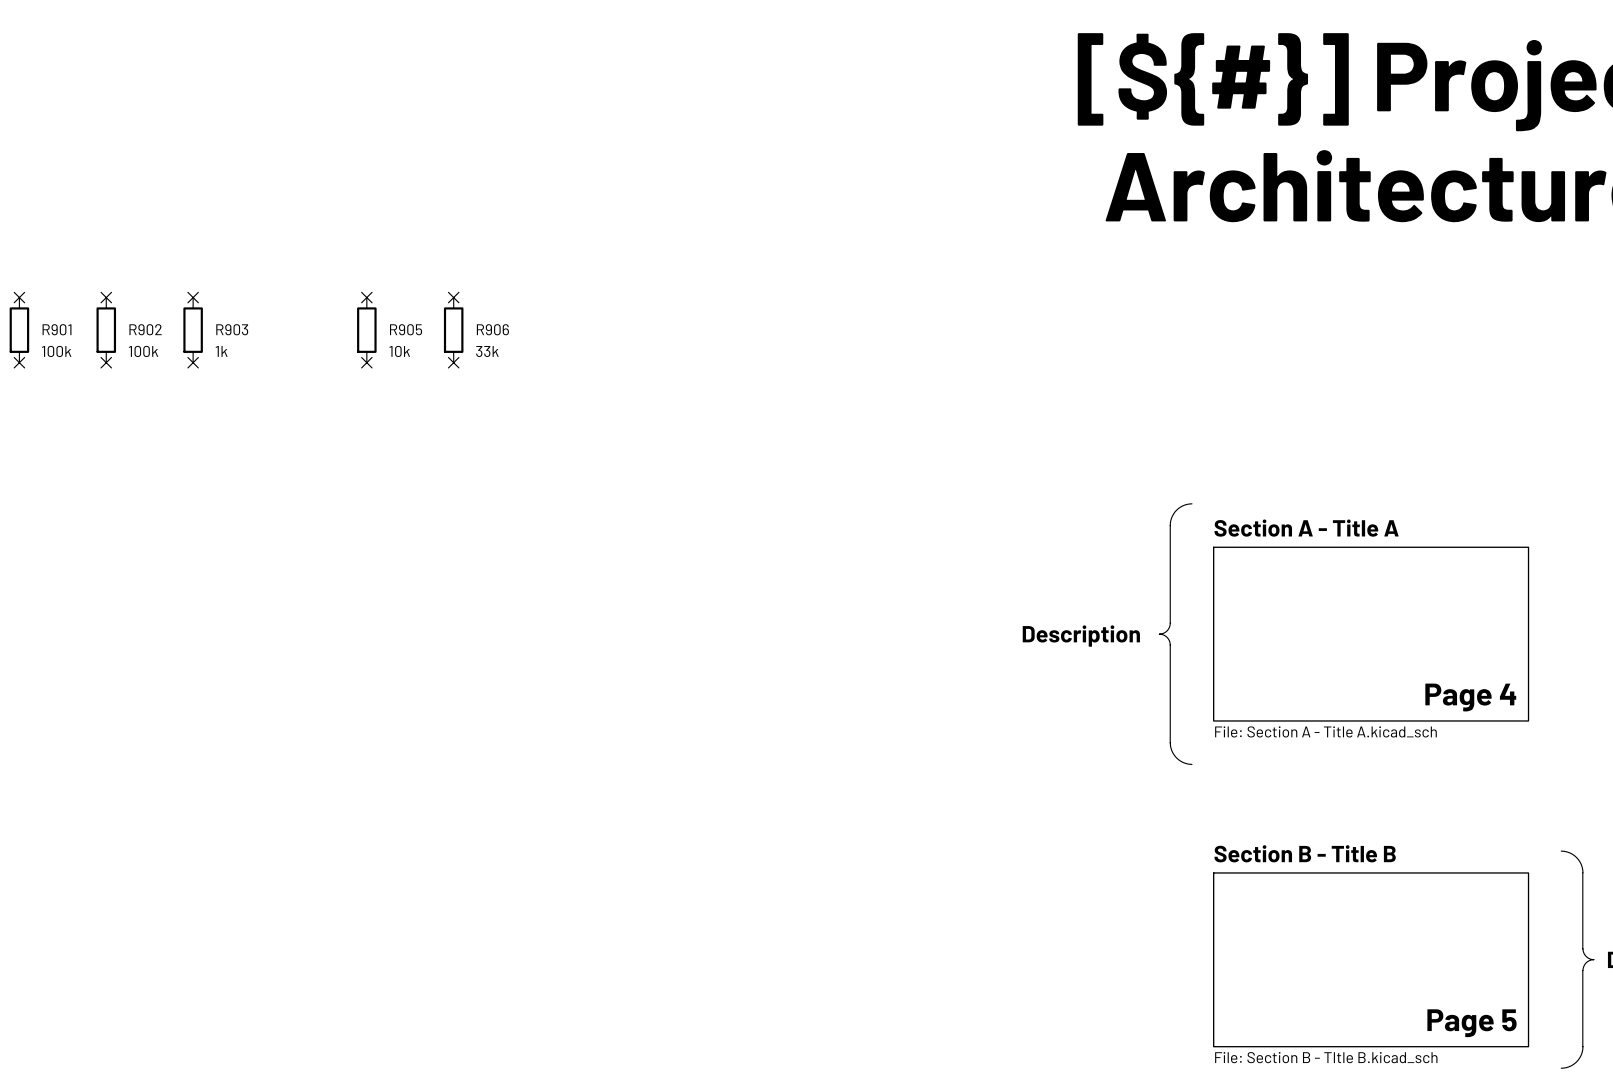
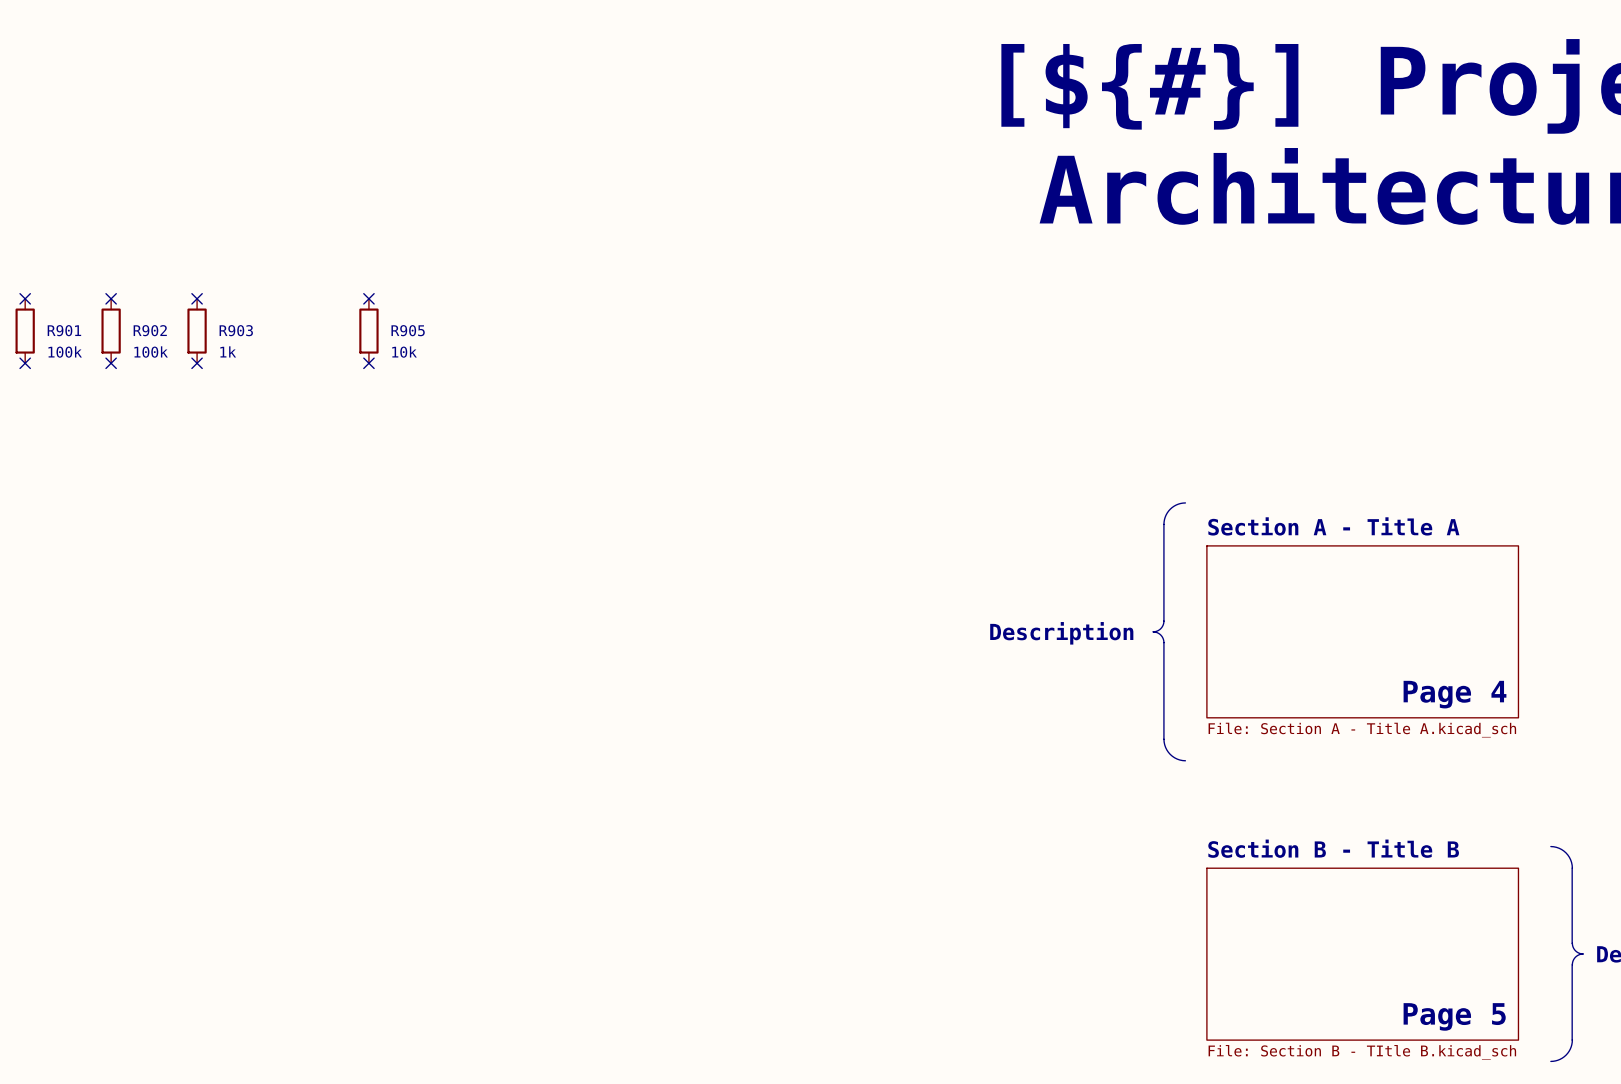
no-connect mark: (453, 297) -> none
R906: 33k (453, 330) -> none
no-connect mark: (453, 362) -> none

